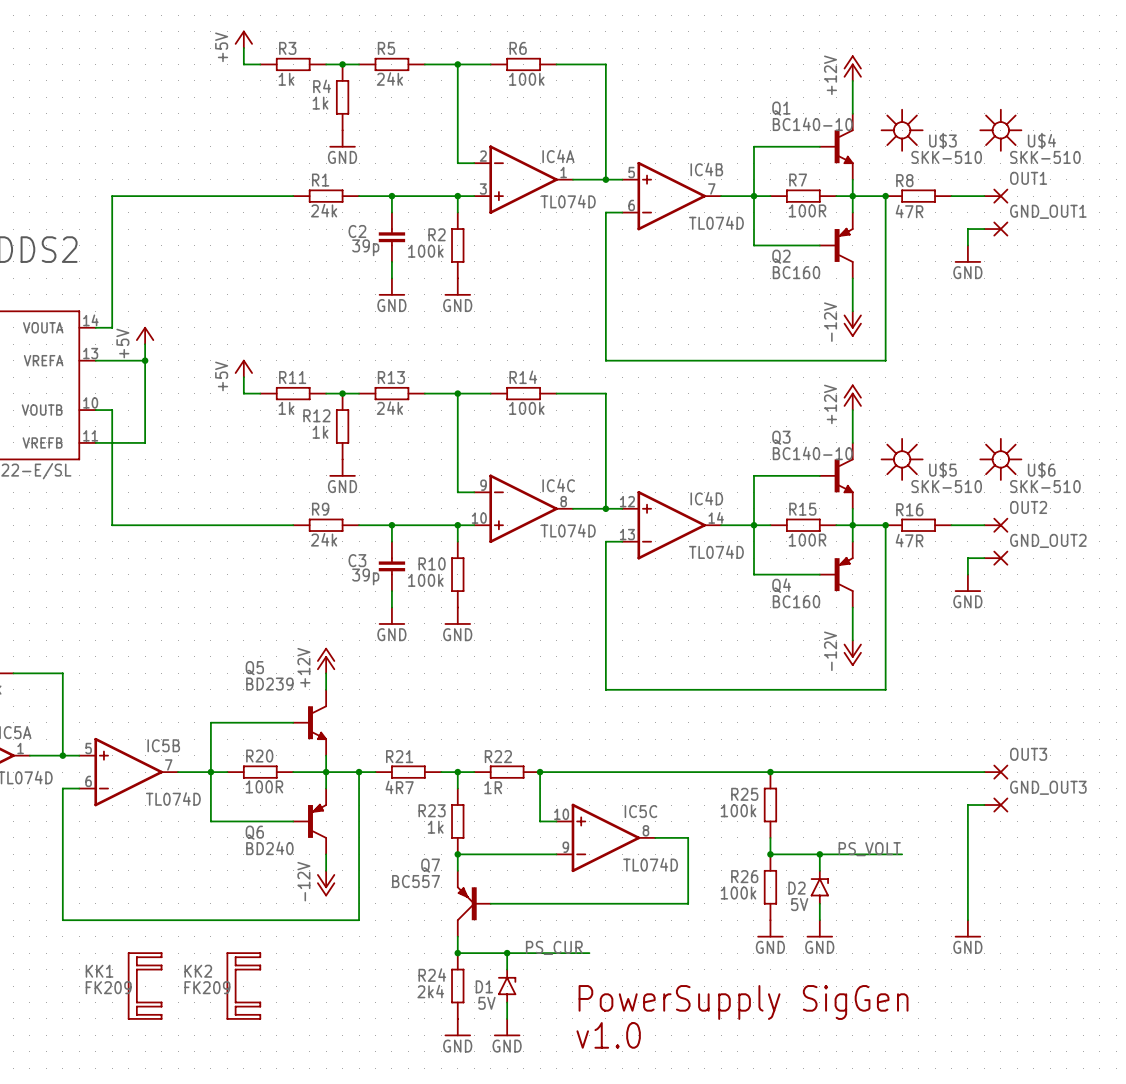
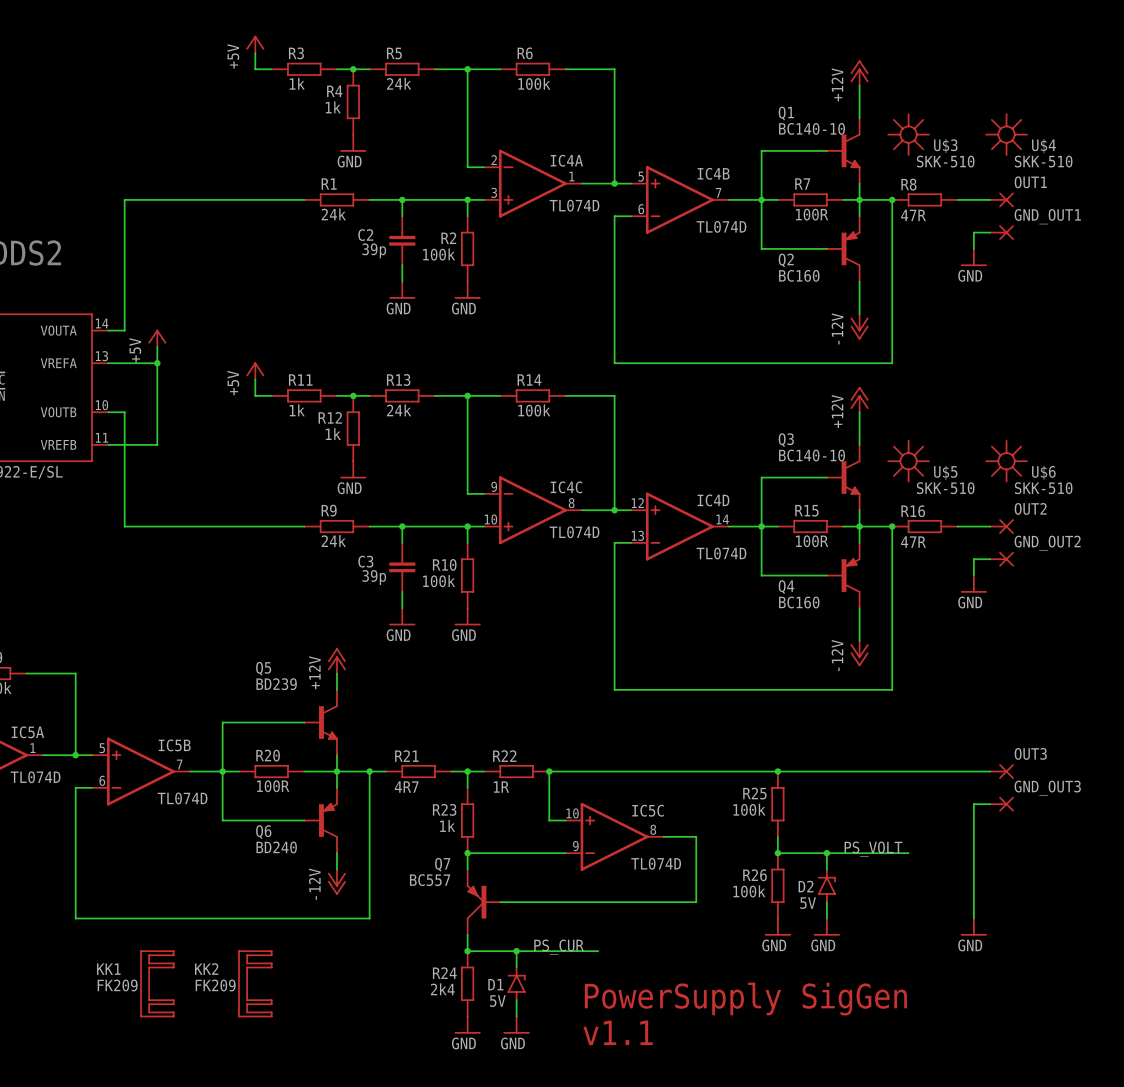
text: v1.0 (608, 1035) -> v1.1 (618, 1032)

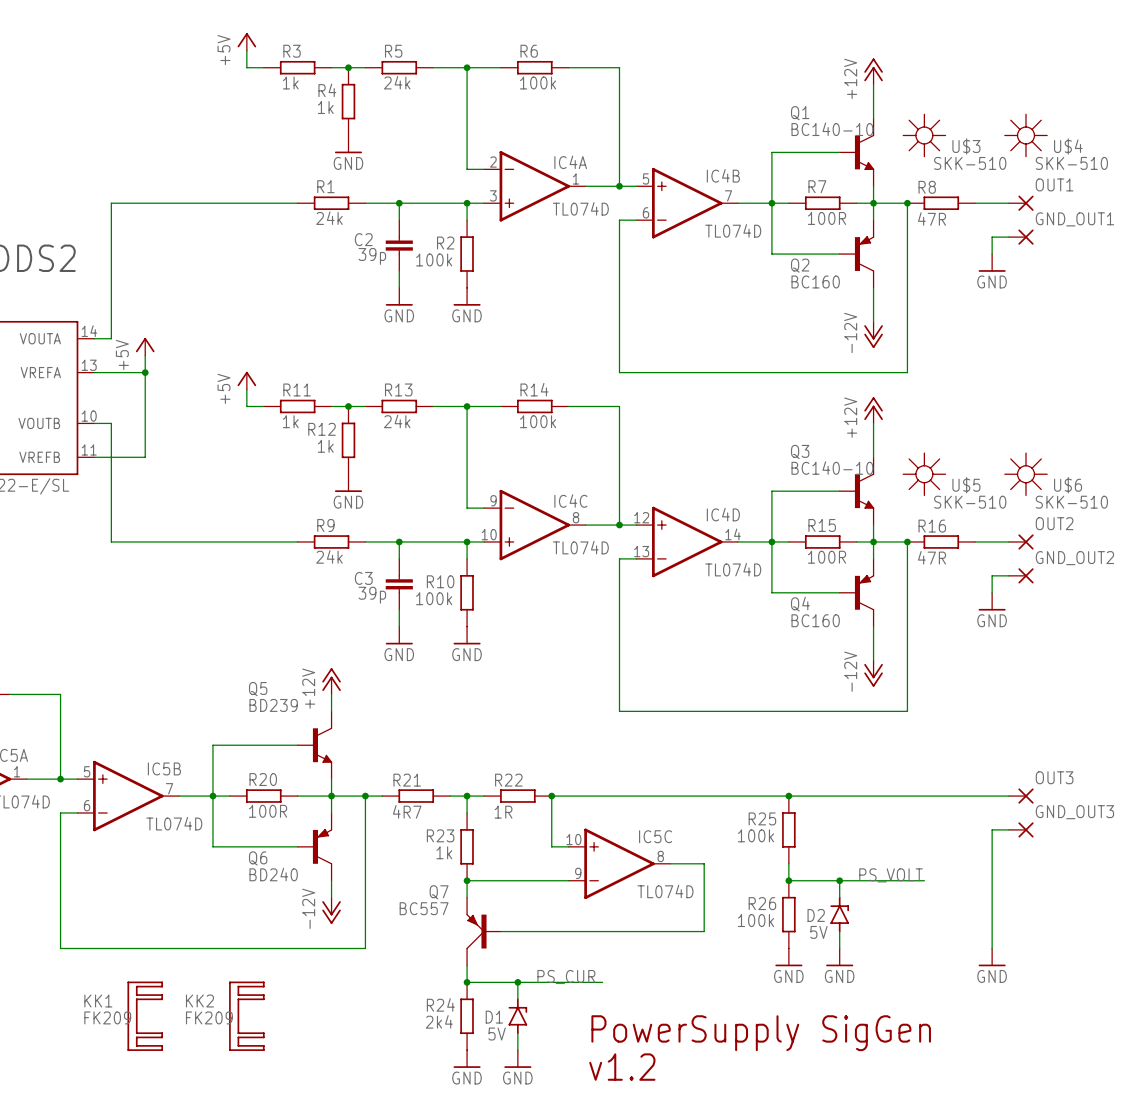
text: v1.1 (618, 1032) -> v1.2 (622, 1067)

